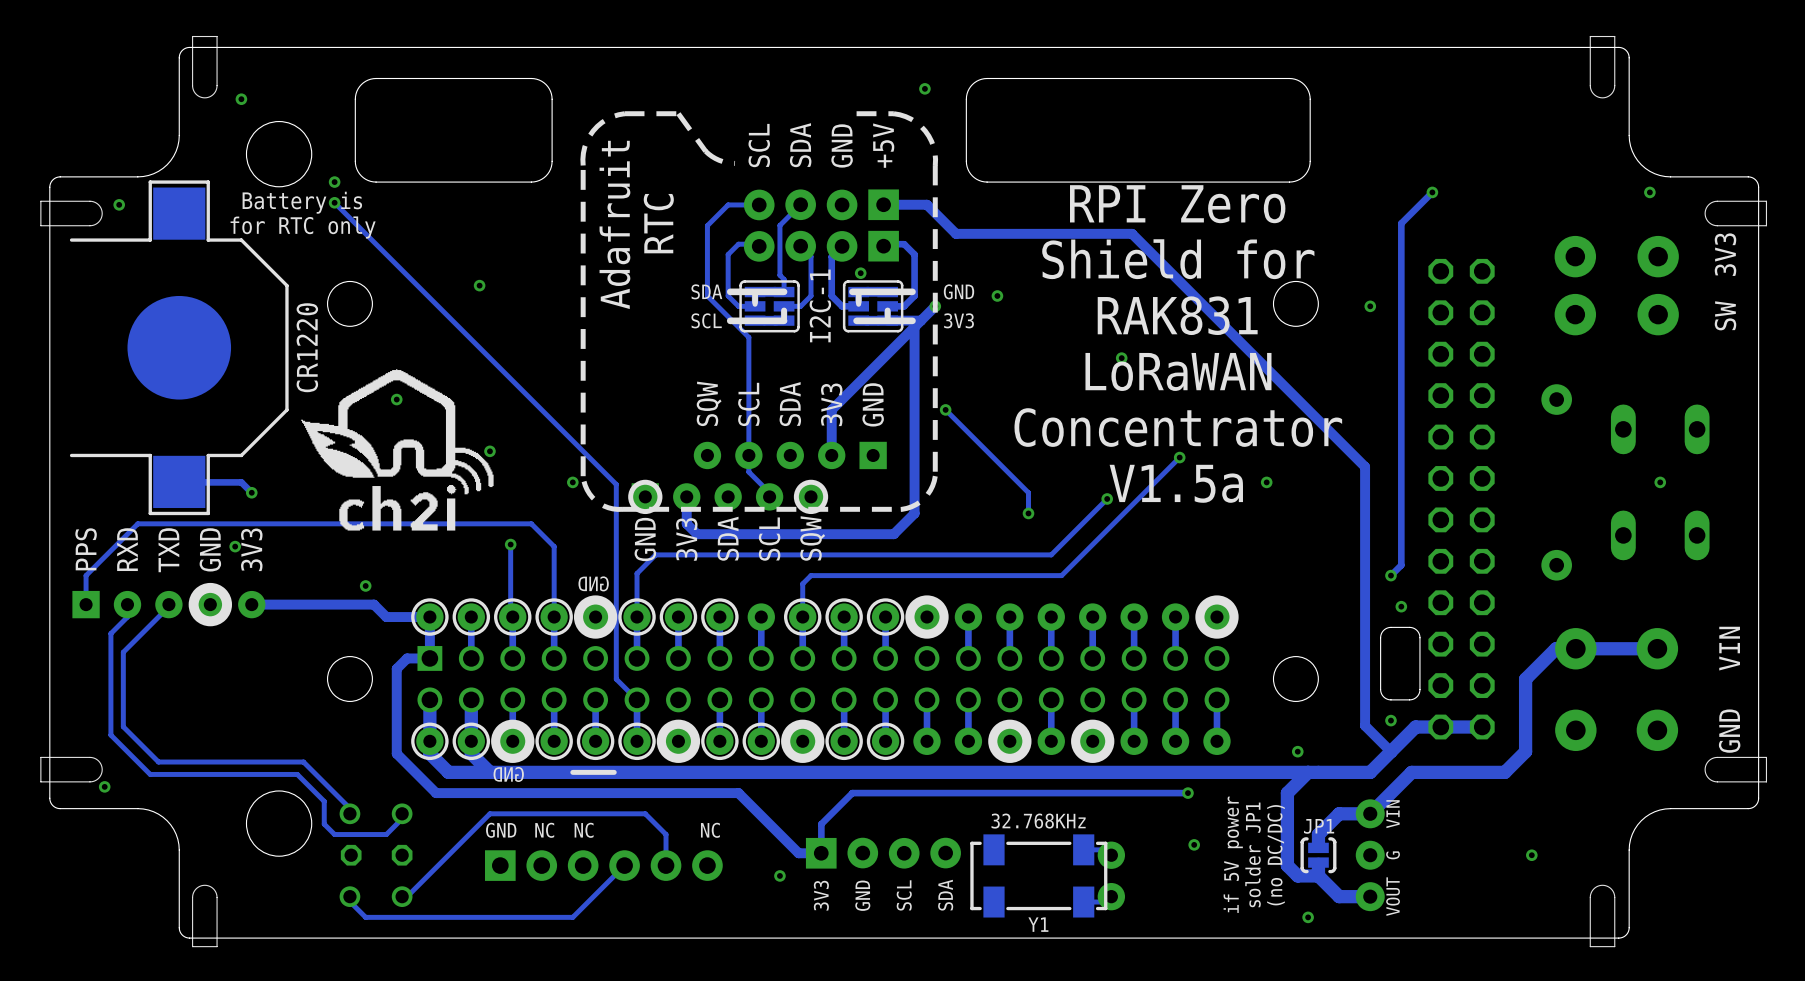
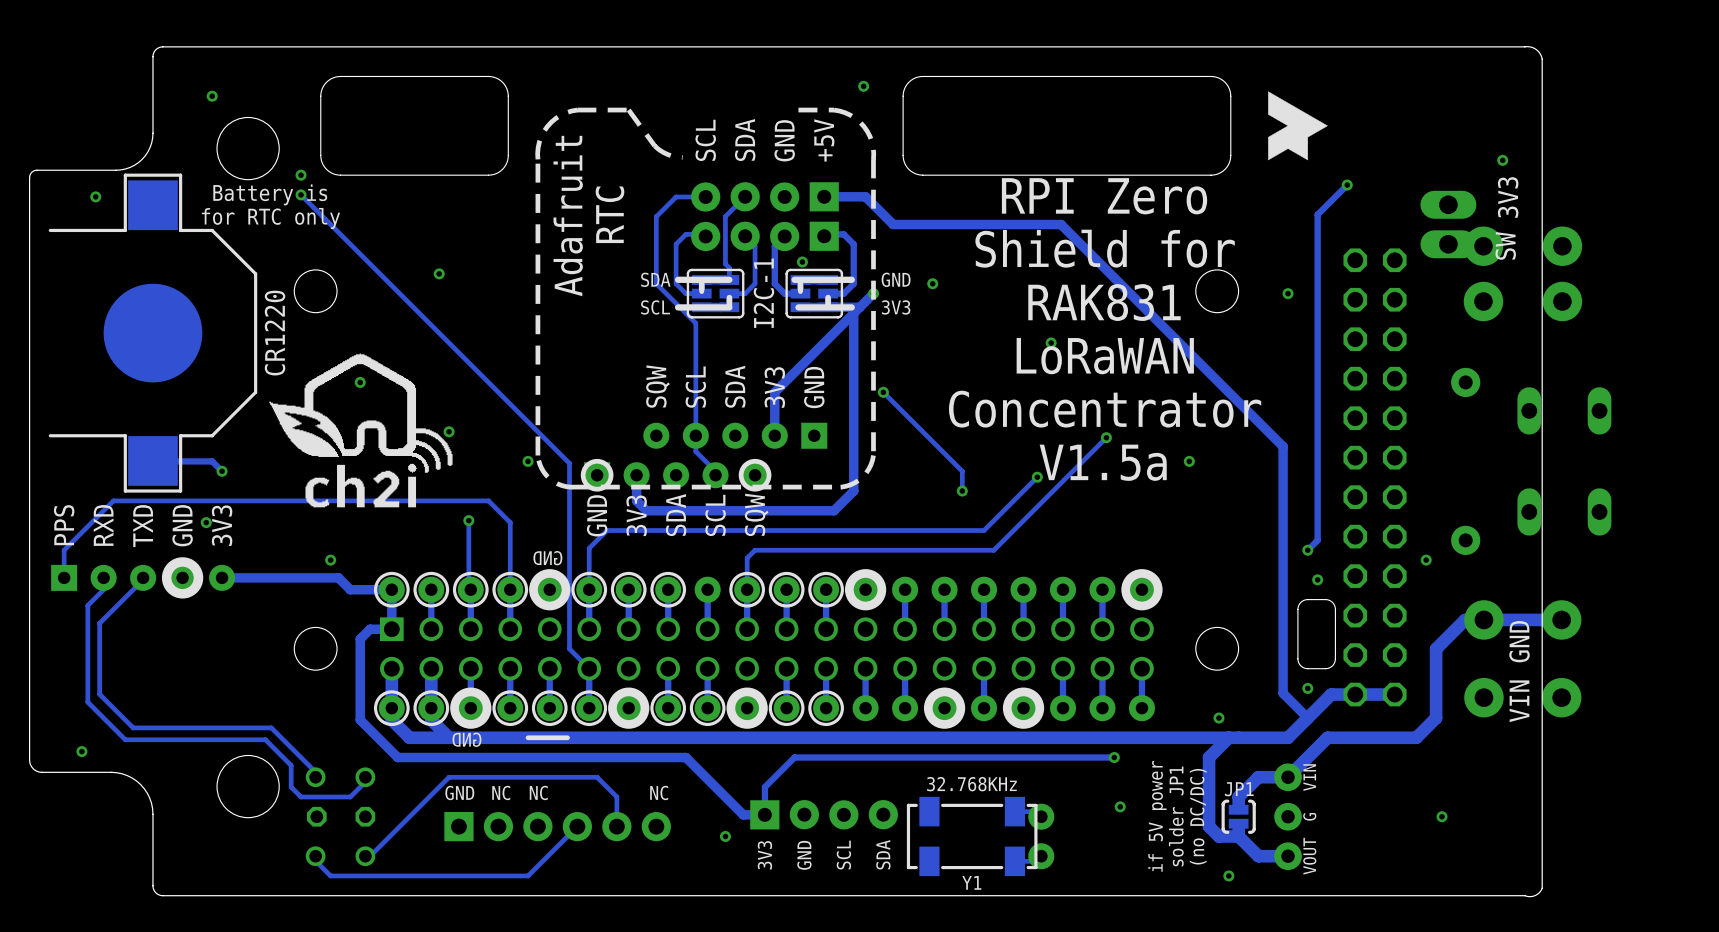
drawing: [40, 36, 1767, 947] -> none
board edge: none -> (1524, 46) (159, 47) (153, 55) (152, 138) (148, 151) (142, 159) (134, 165) (120, 169) (36, 170) (31, 172) (29, 176) (30, 764) (34, 769) (40, 772) (116, 772) (127, 775) (140, 784) (149, 798) (152, 808) (153, 887) (155, 892) (161, 895) (1535, 895) (1542, 888) (1542, 59) (1536, 49) (1524, 46)
drawing: none -> [1268, 91, 1328, 161]
via position: (1649, 192) -> (1502, 160)
part: none -> (1448, 224)
text position: 3V3 (1725, 254) -> 3V3 (1508, 197)
text position: SW (1725, 315) -> SW (1505, 245)
via: (1660, 482) -> none
via: none -> (1426, 560)
text position: VIN (1729, 648) -> VIN (1519, 701)
text position: GND (1729, 731) -> GND (1519, 641)

